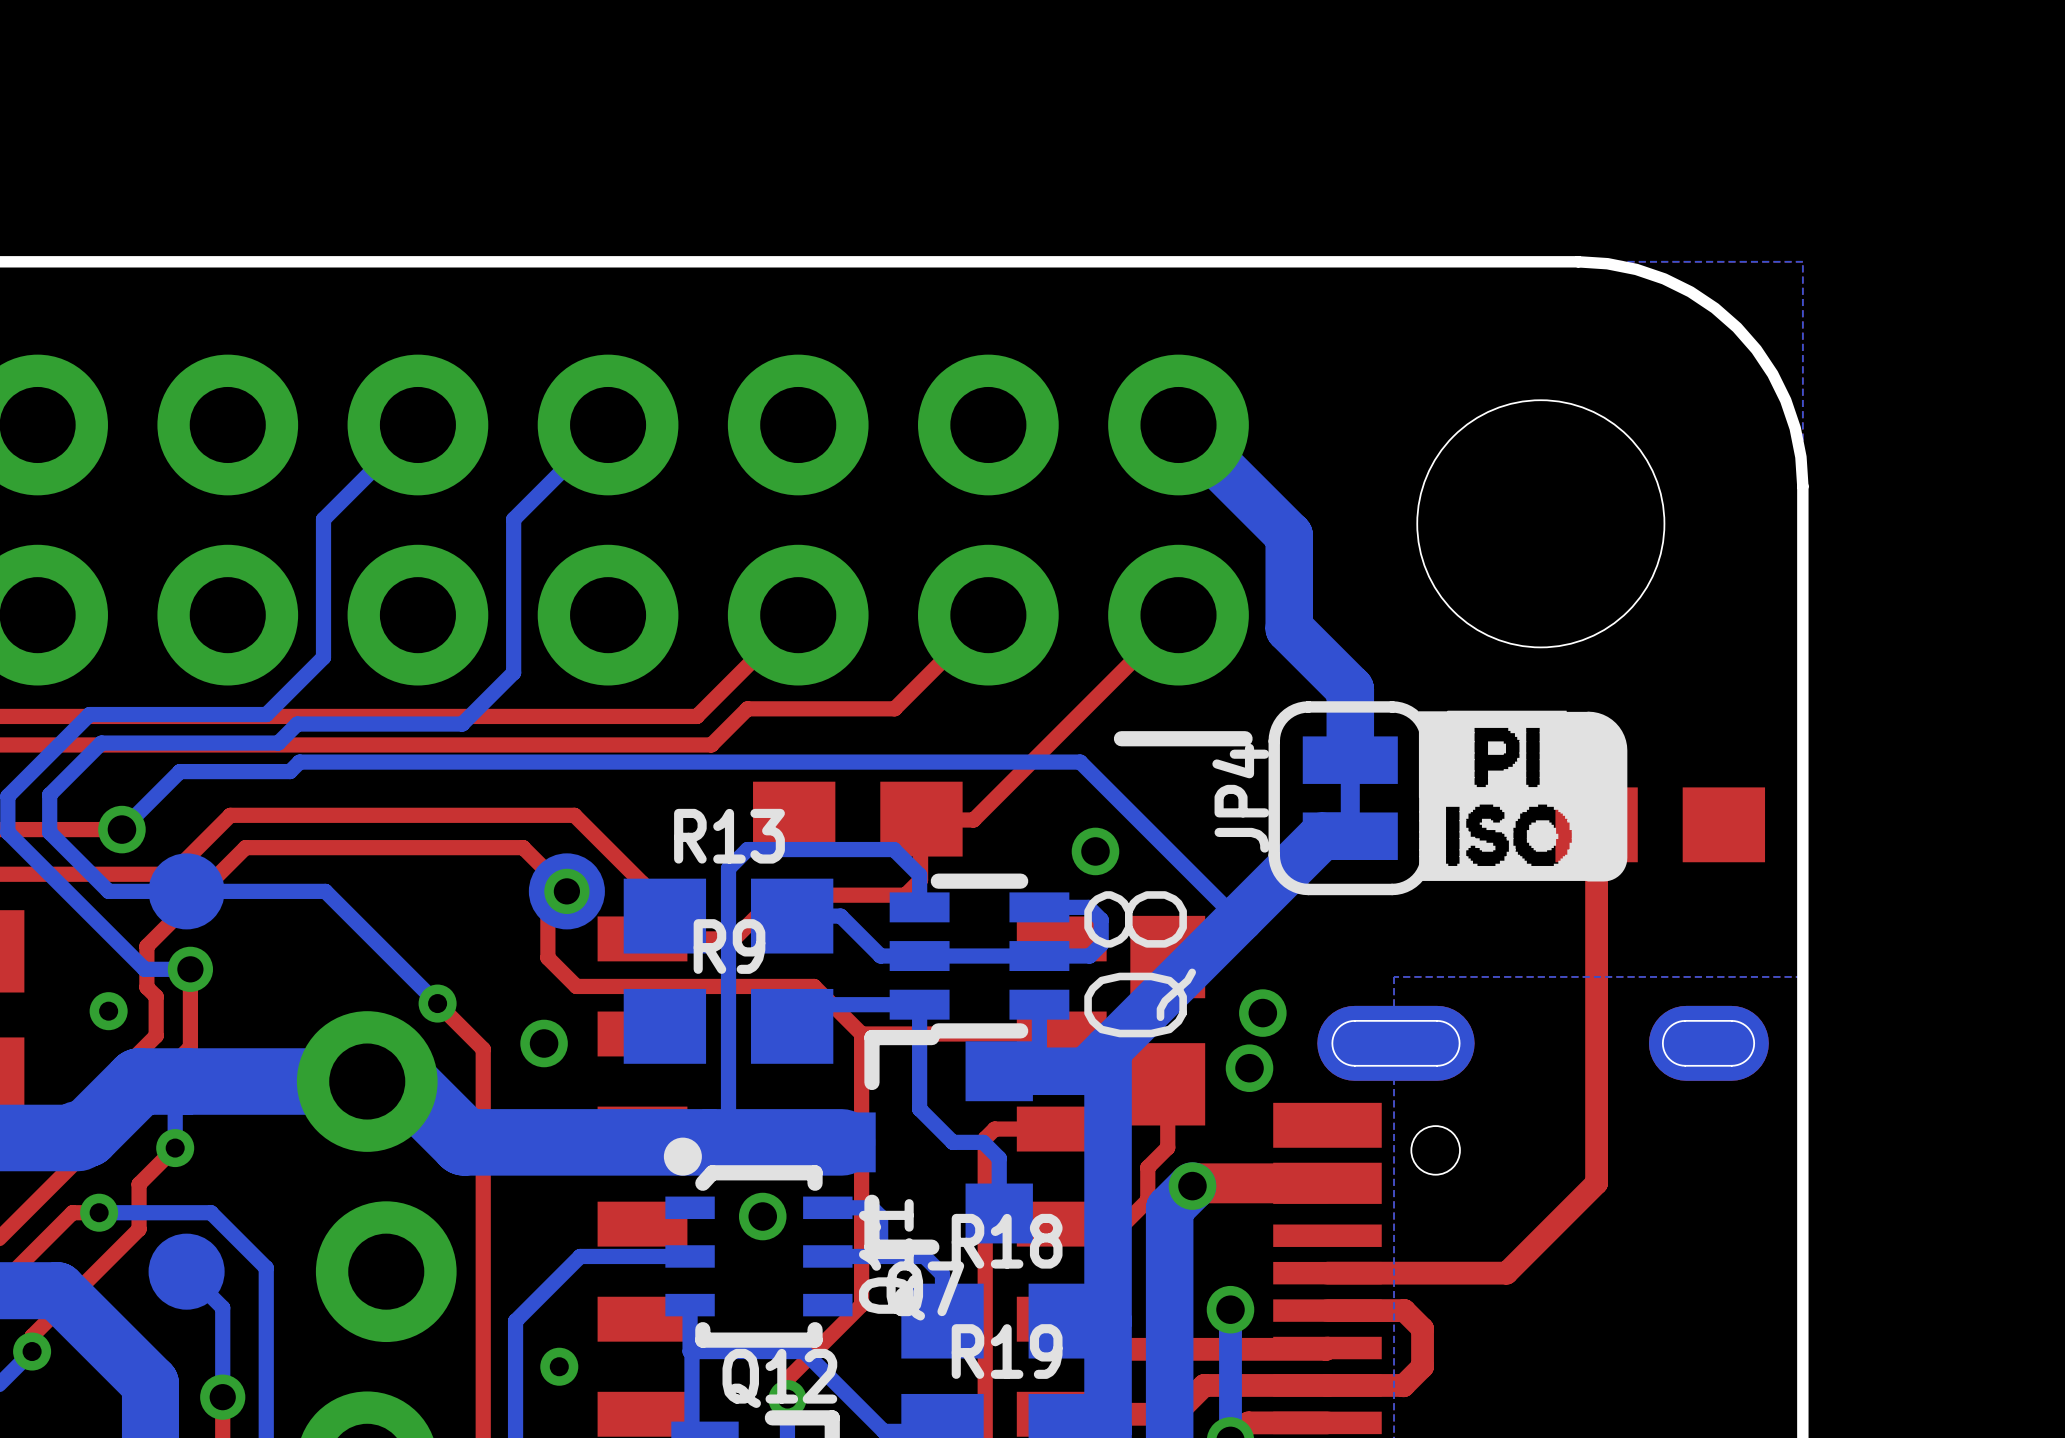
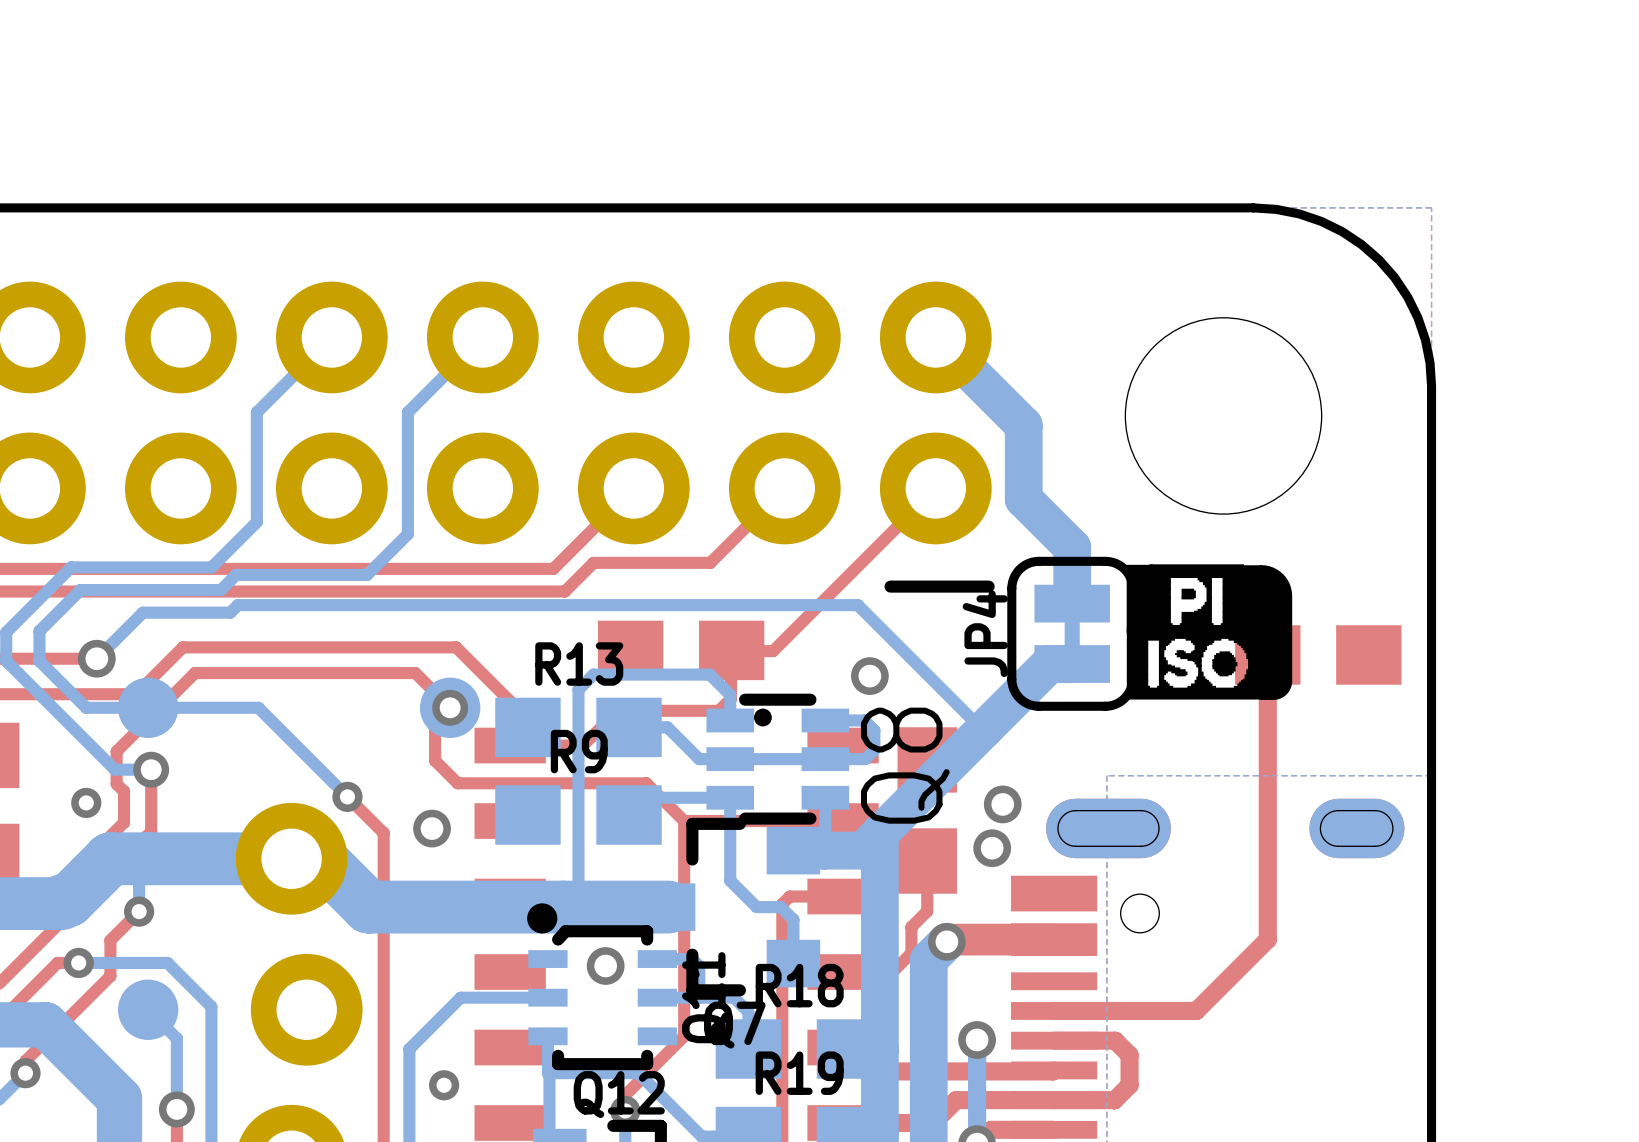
Q8 footprint: [889, 873, 1070, 1039] -> [706, 693, 850, 825]

